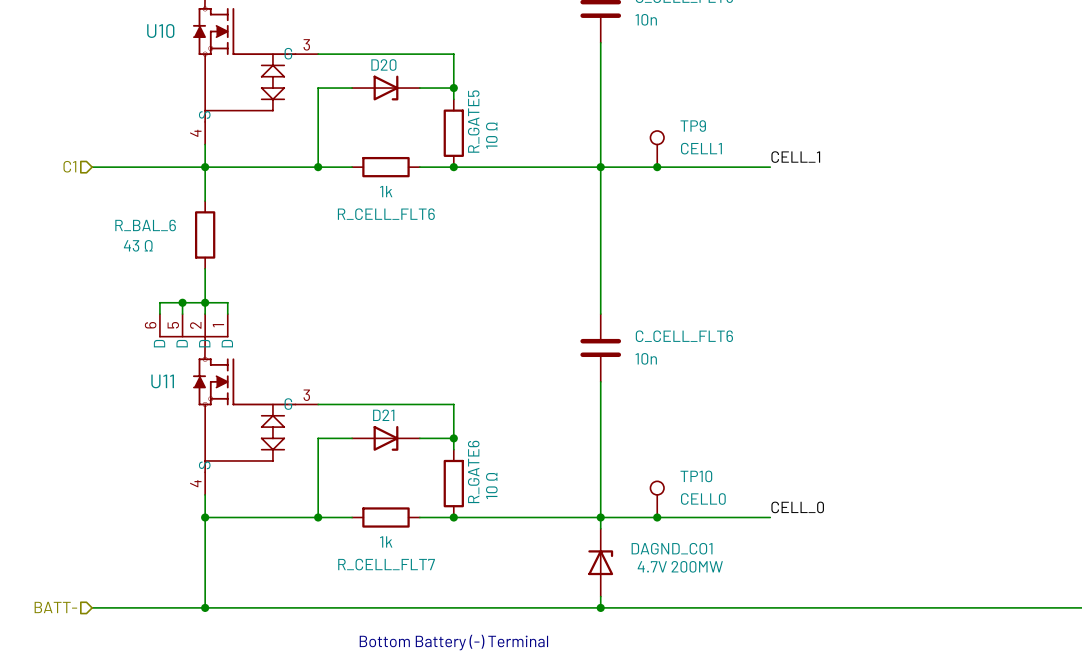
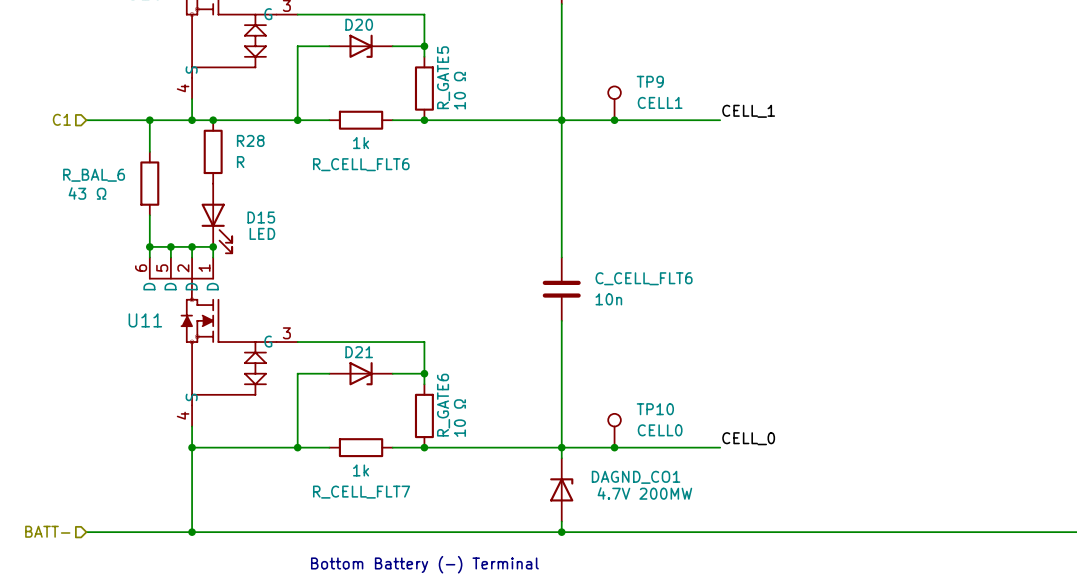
junction: none -> (149, 120)
wire: (205, 167) (205, 201) -> (149, 120) (149, 151)
junction: none -> (213, 120)
R28: none -> R (213, 151)
R_BAL_6 position: (205, 234) -> (149, 183)
wire: (205, 268) (205, 302) -> (149, 215) (149, 246)
D15: none -> LED (216, 218)
junction: none -> (149, 246)
junction: none -> (213, 246)

